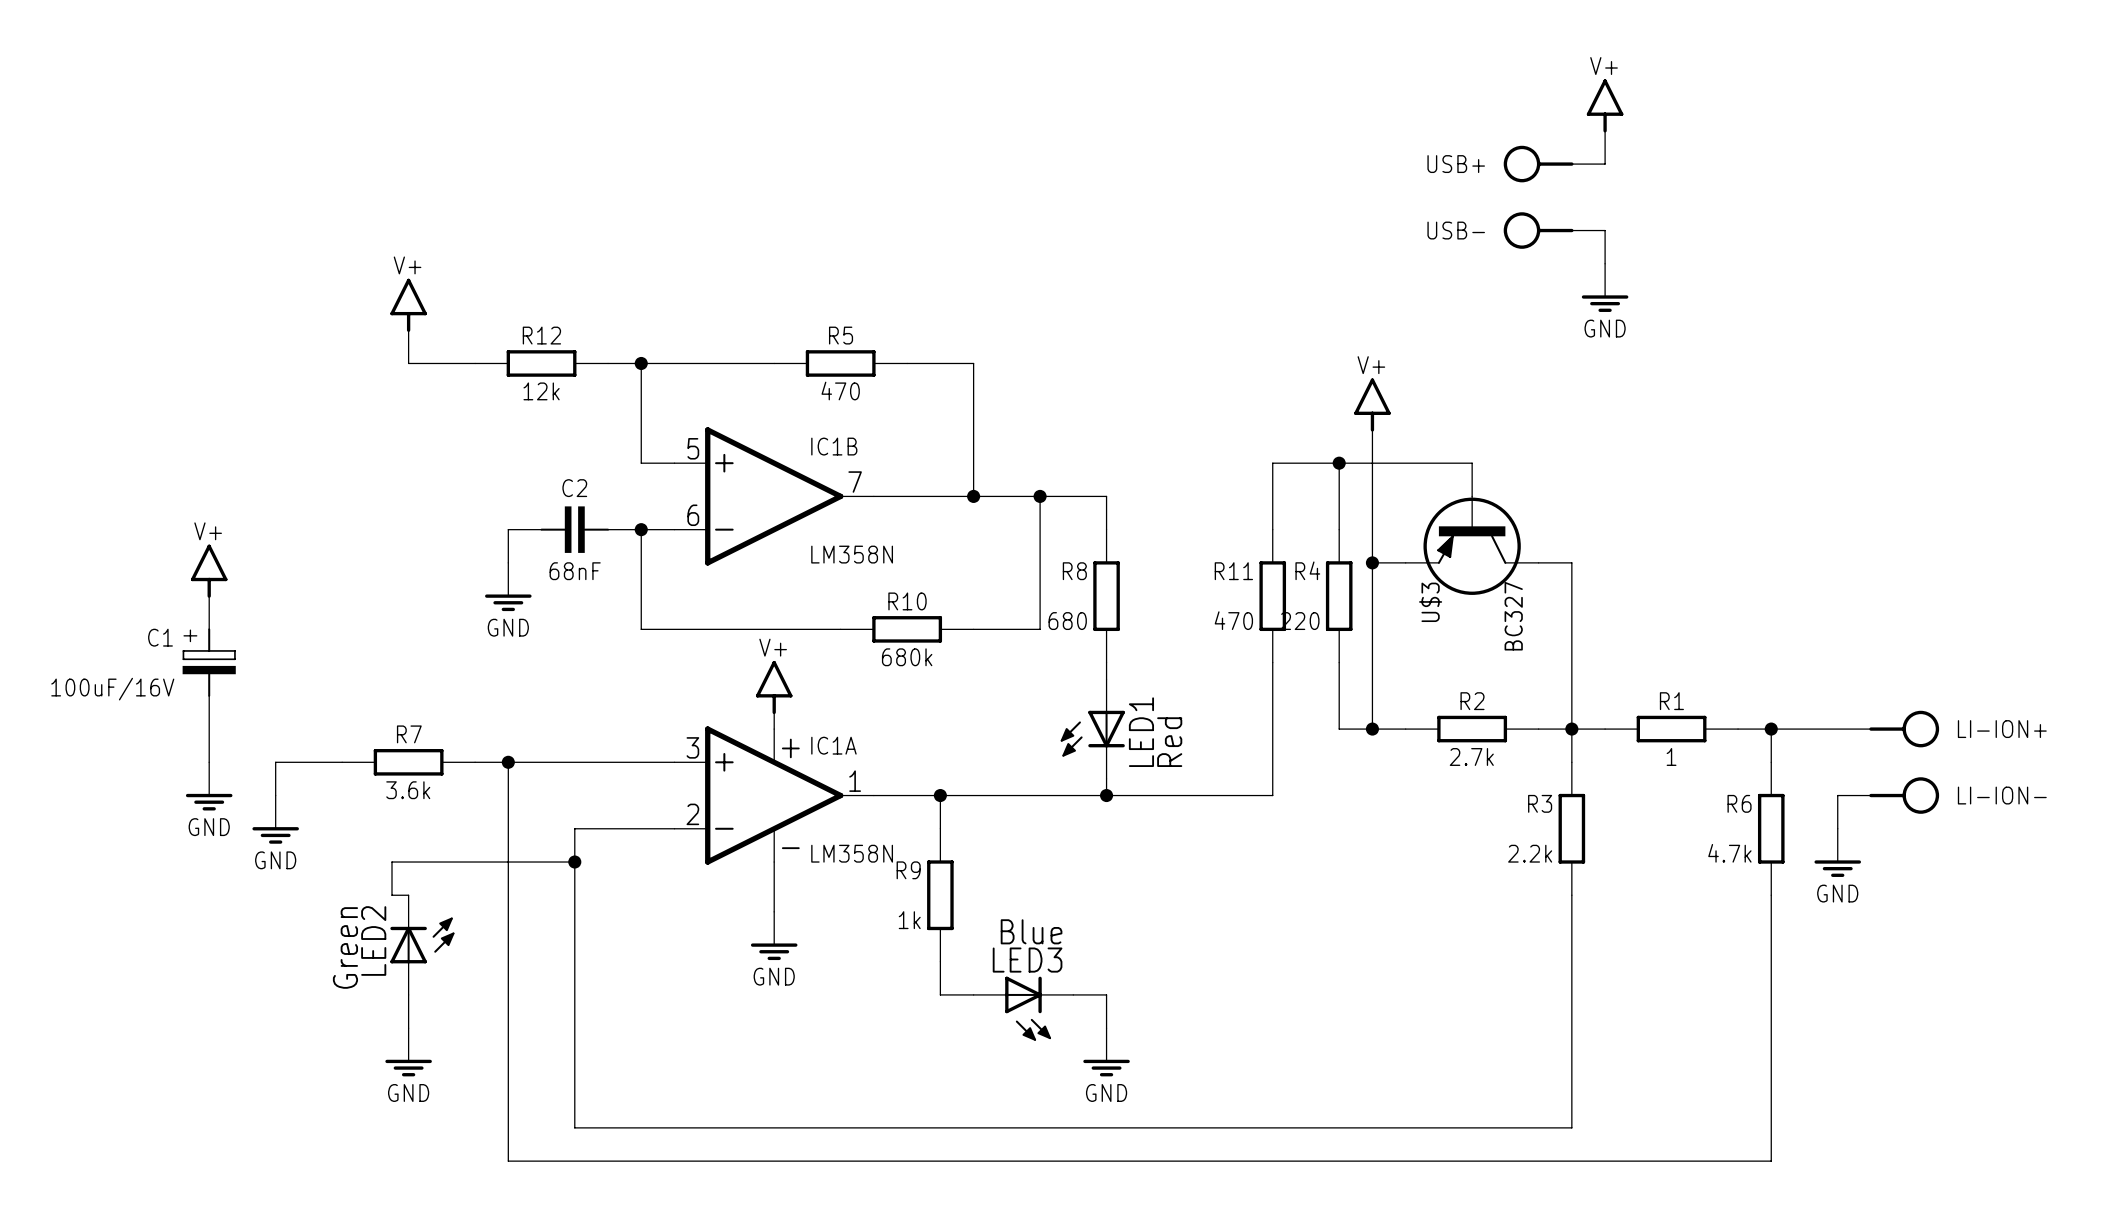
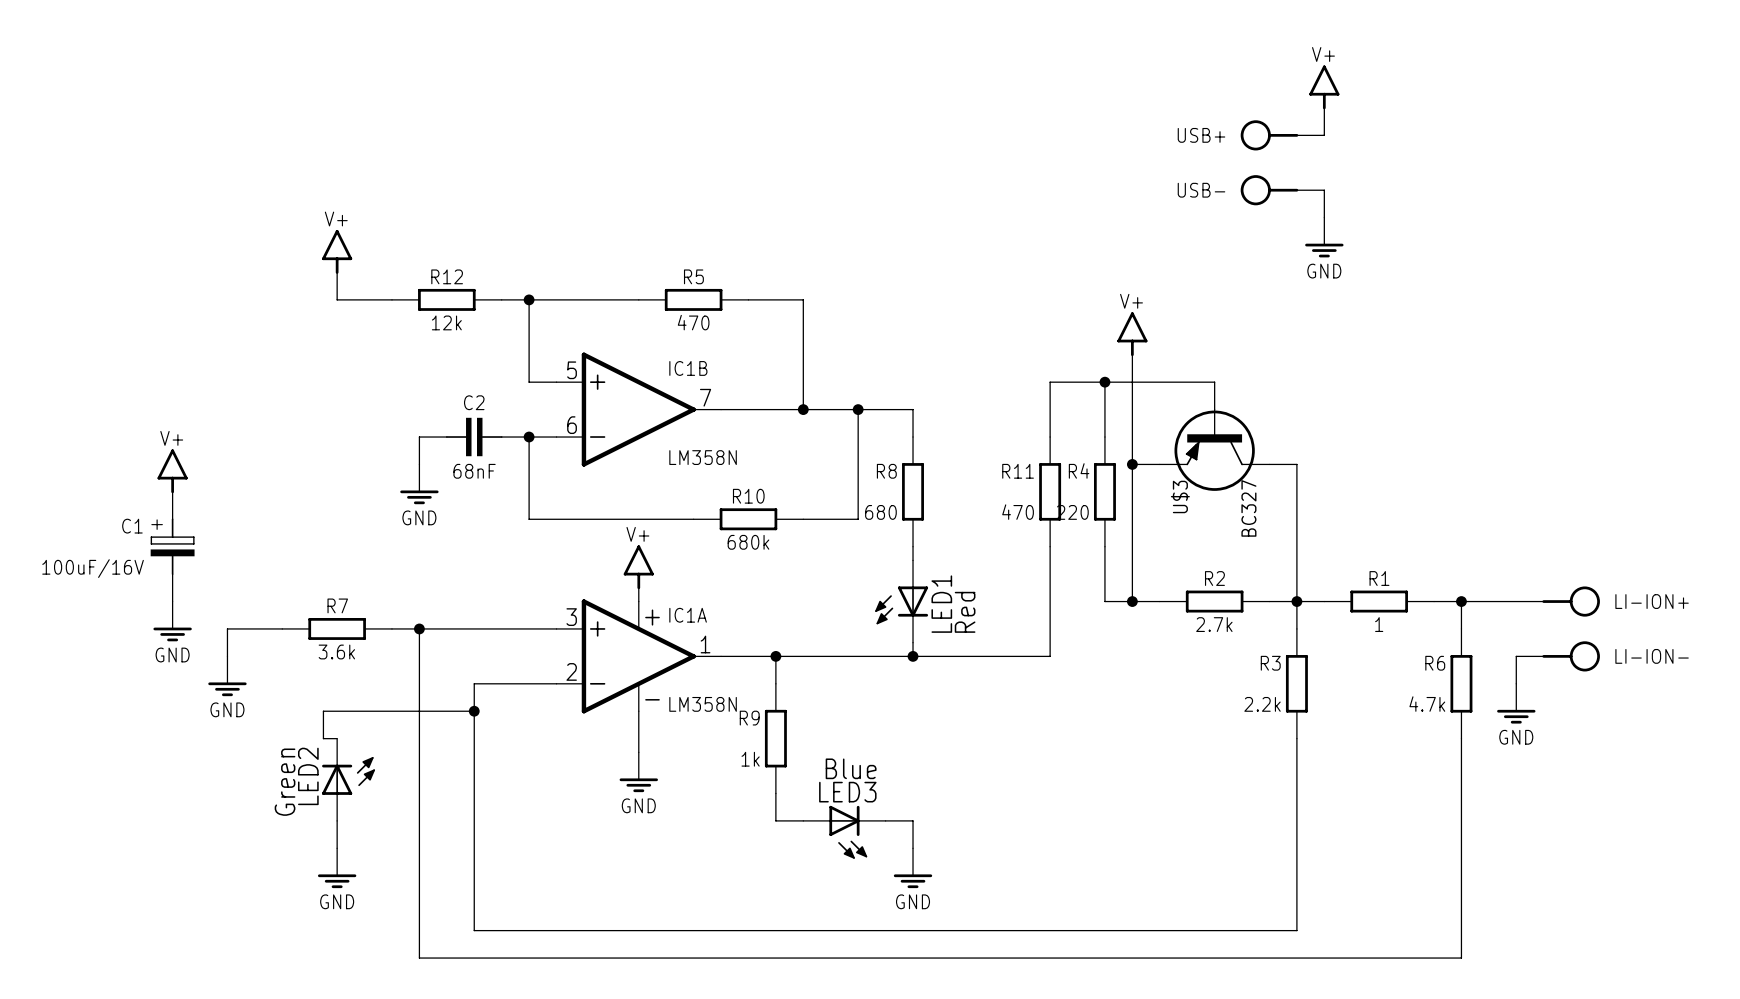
part: none -> (172, 621)
power symbol: GND (209, 786) -> none

